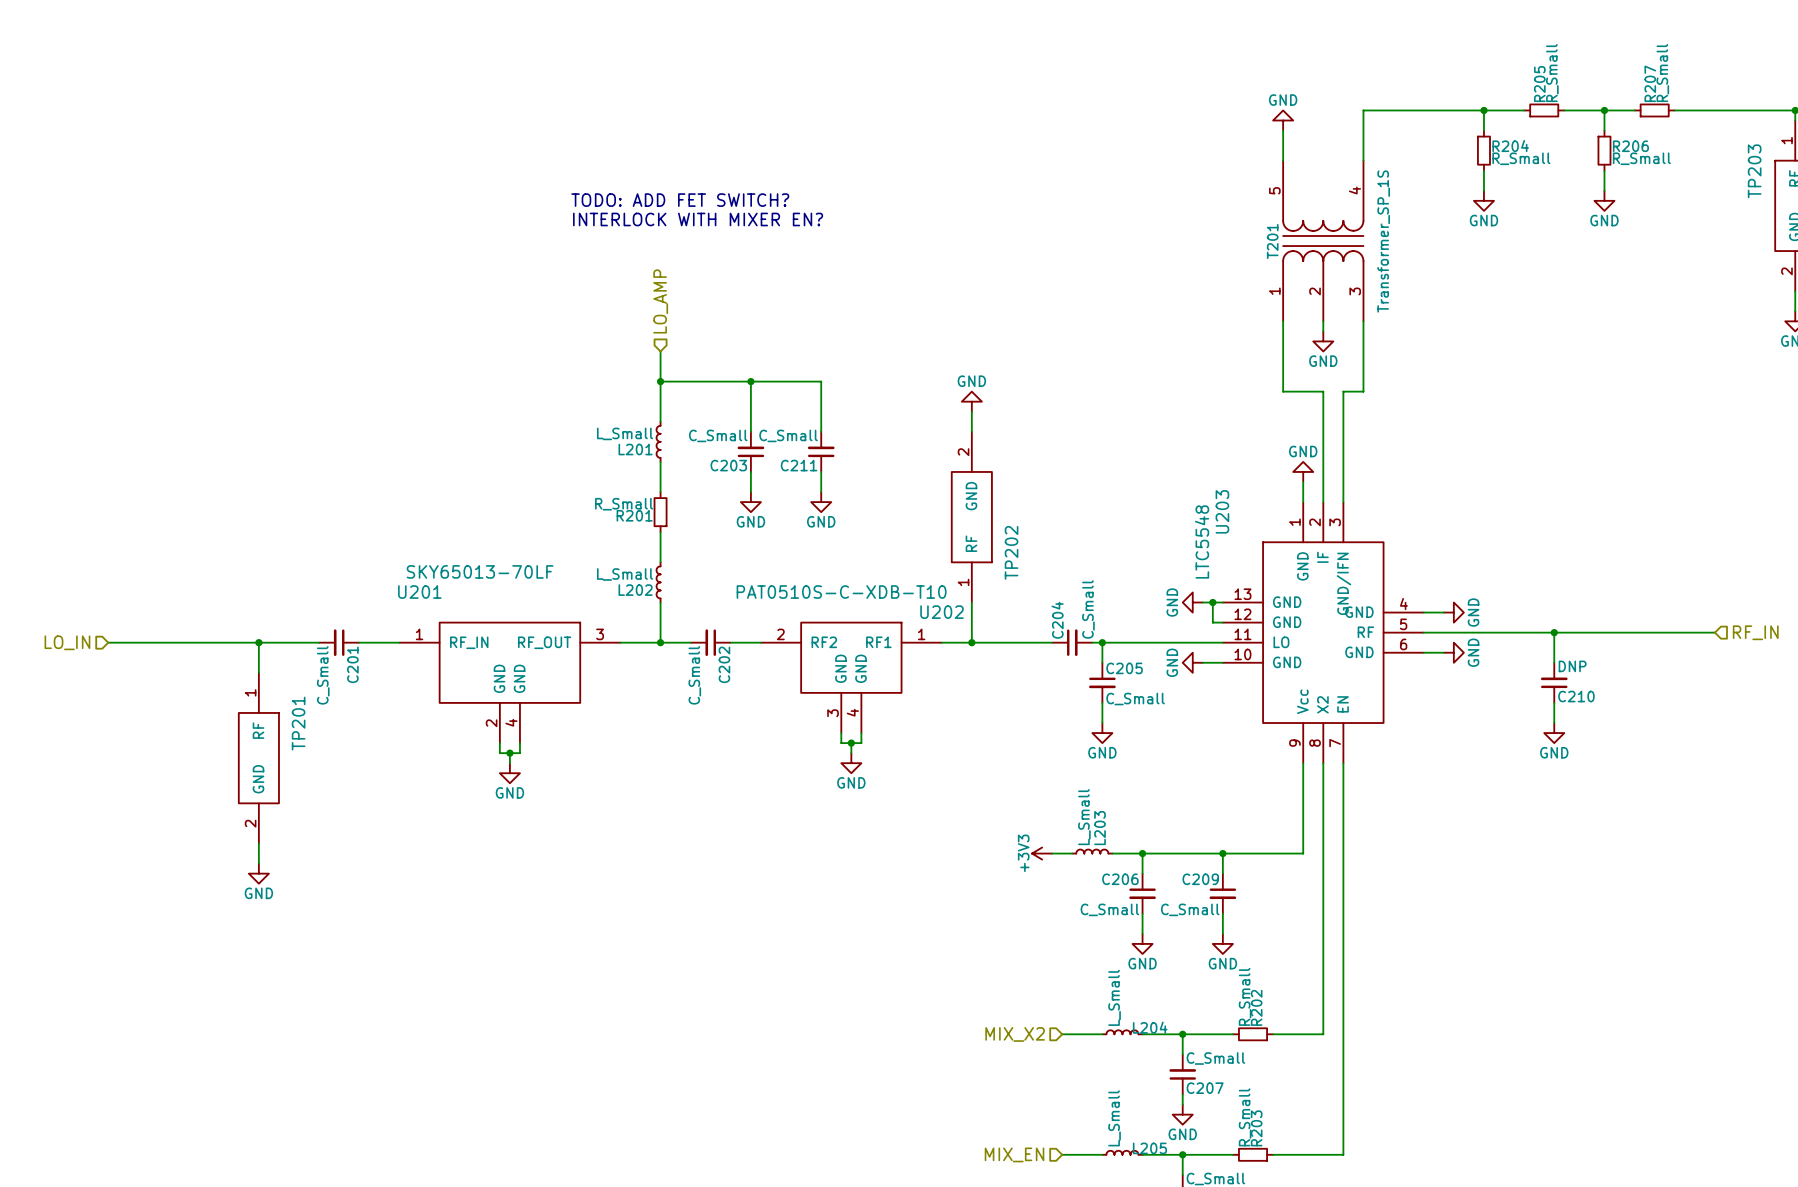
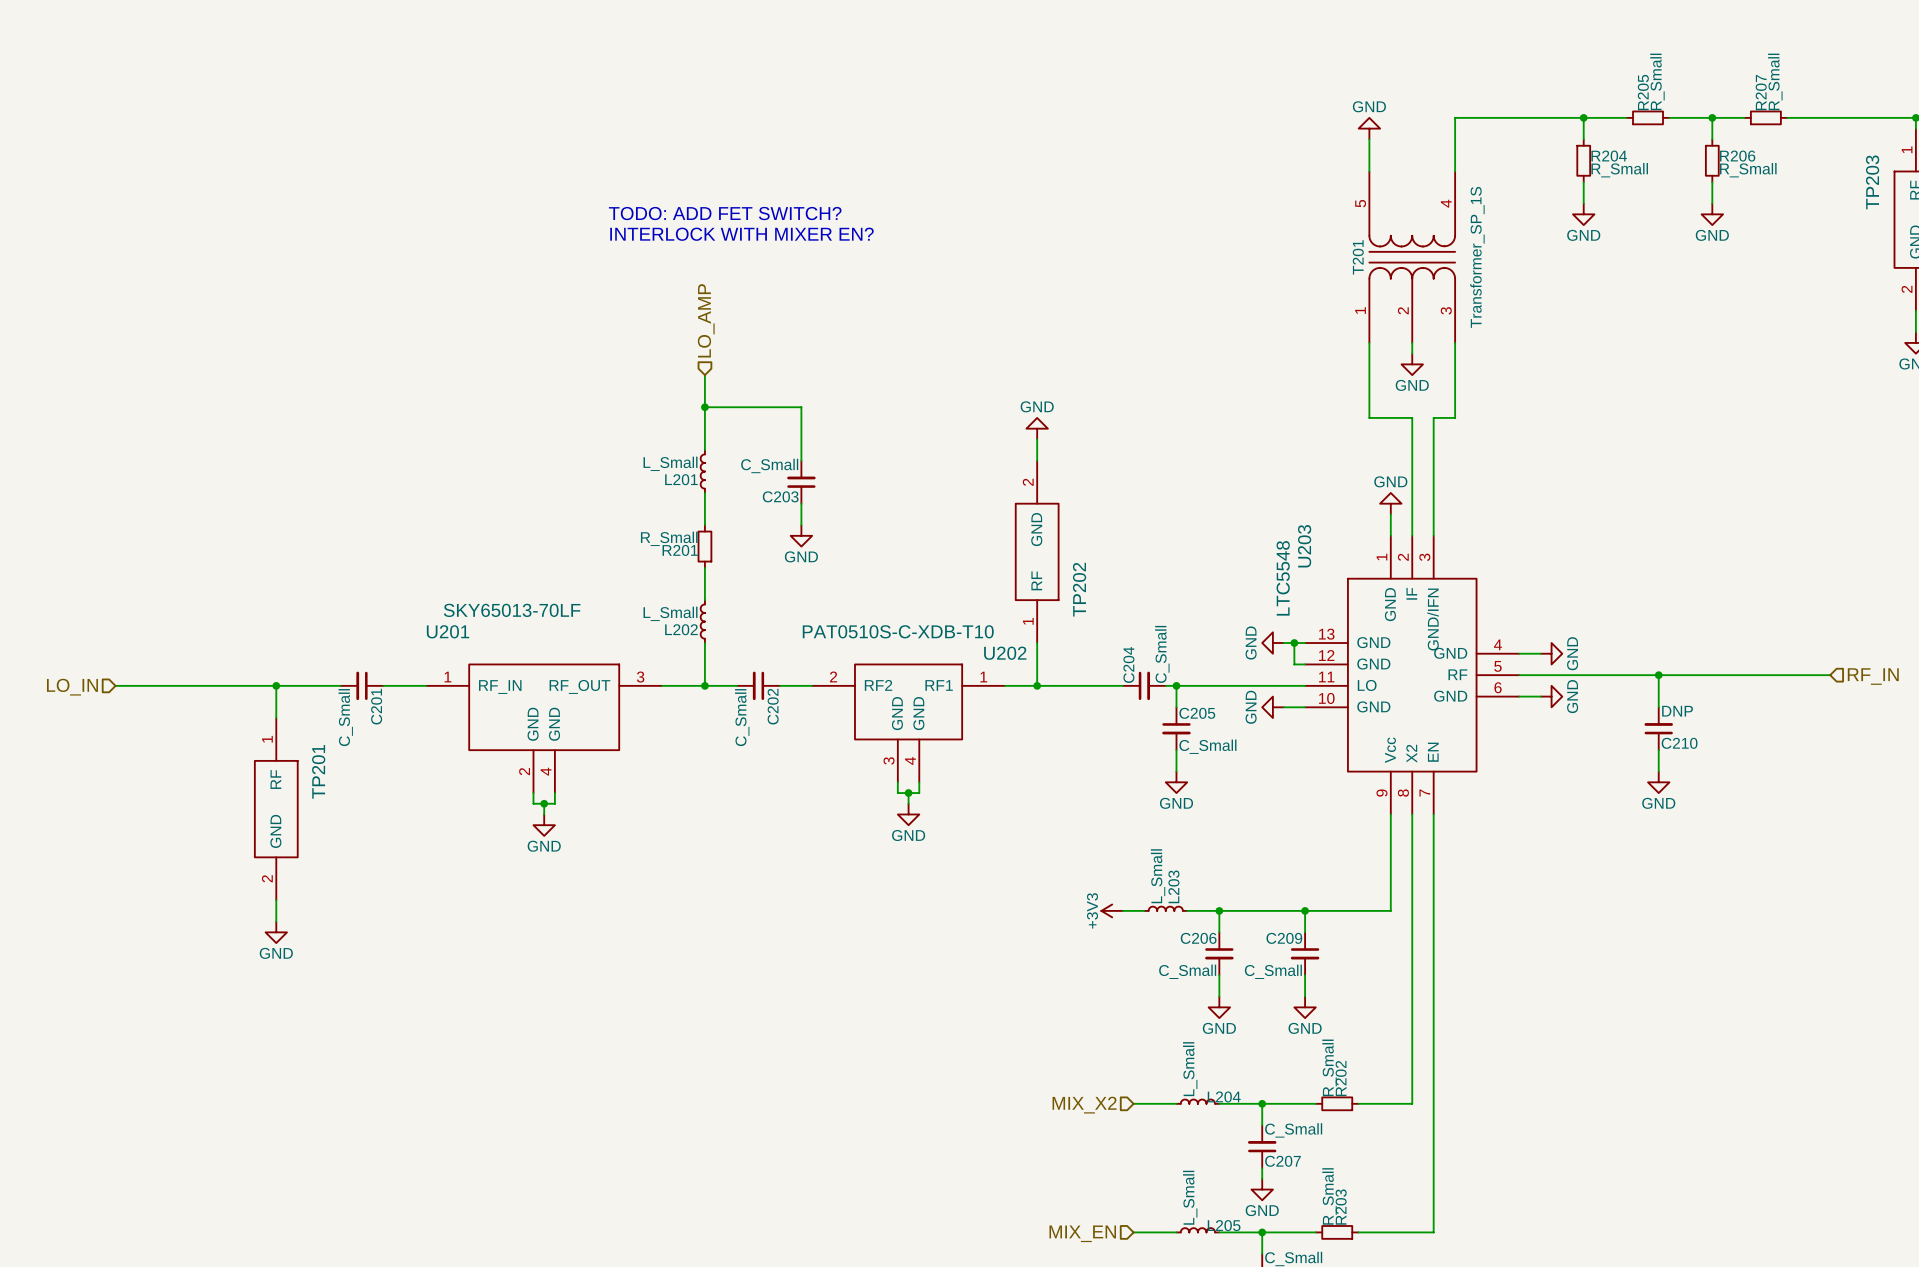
wire: (750, 381) (821, 381) (821, 431) -> none
junction: (750, 381) -> none
C211: C_Small (821, 451) -> none
wire: (821, 471) (821, 492) -> none
power symbol: GND (821, 502) -> none

